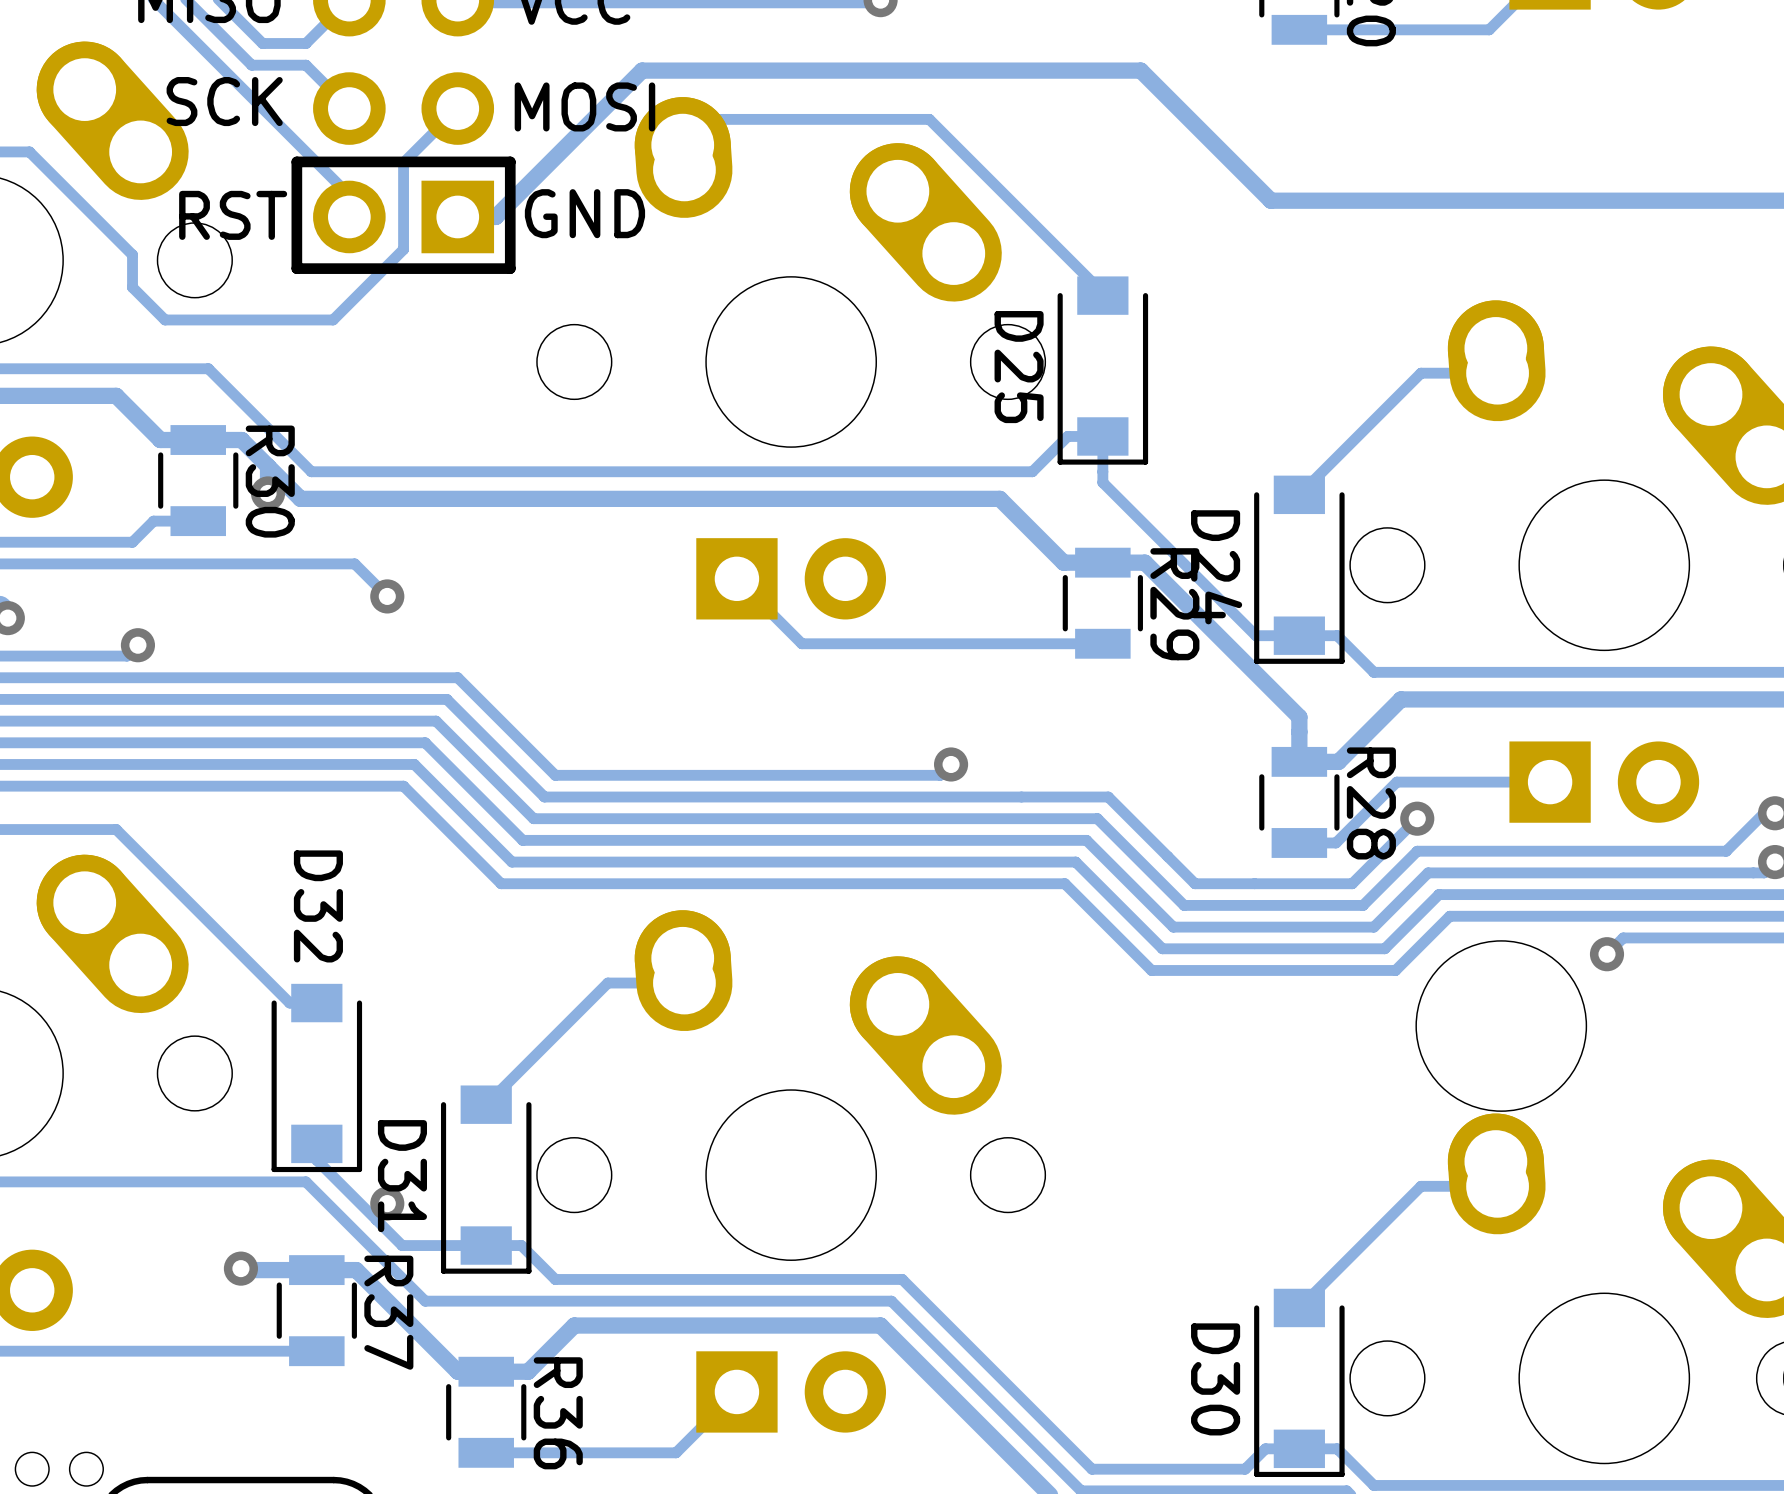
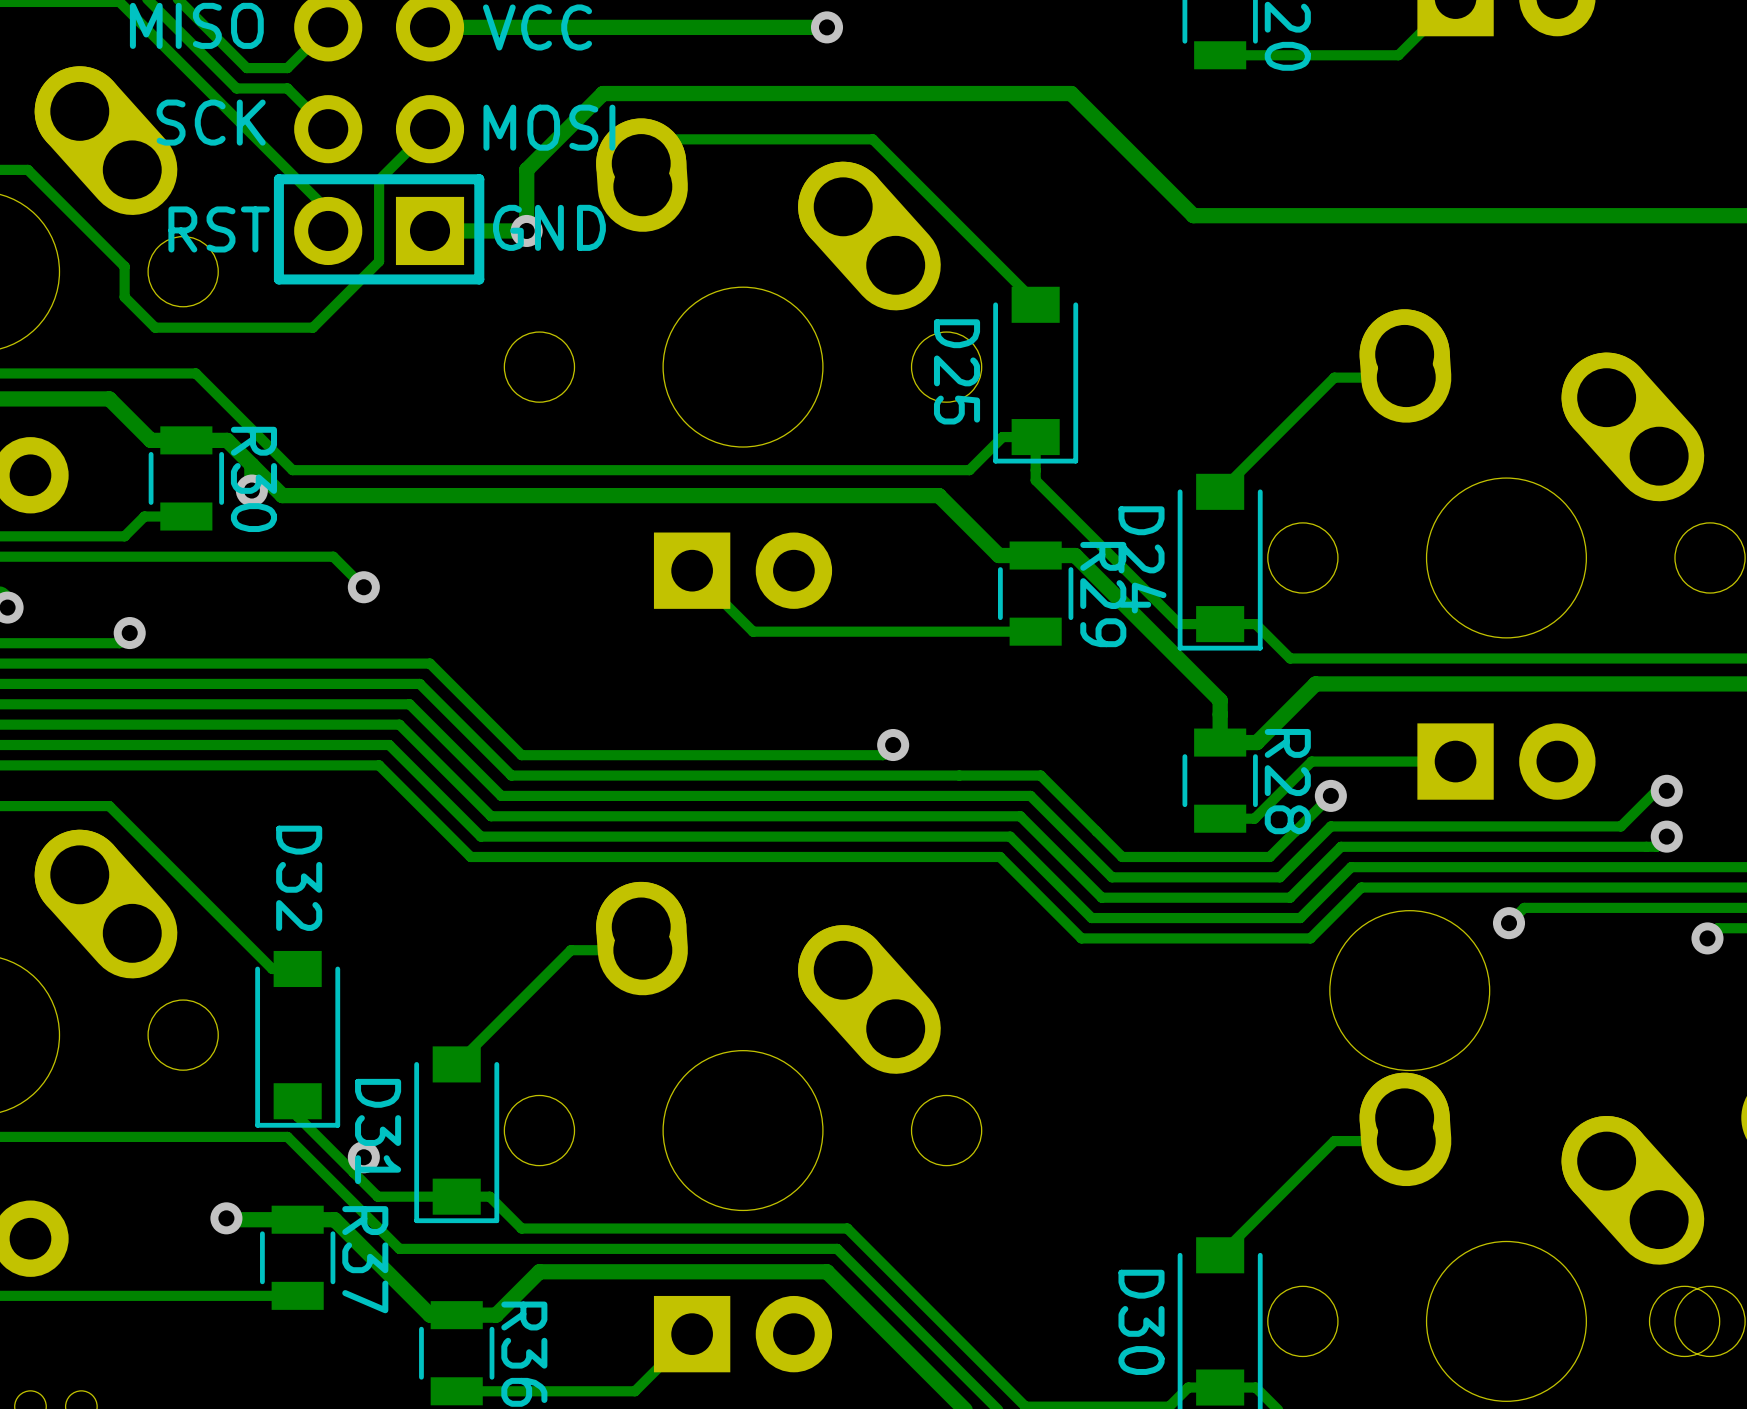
track: (560, 151) (495, 216) -> (526, 169) (526, 230) (465, 230)
via: none -> (526, 230)

